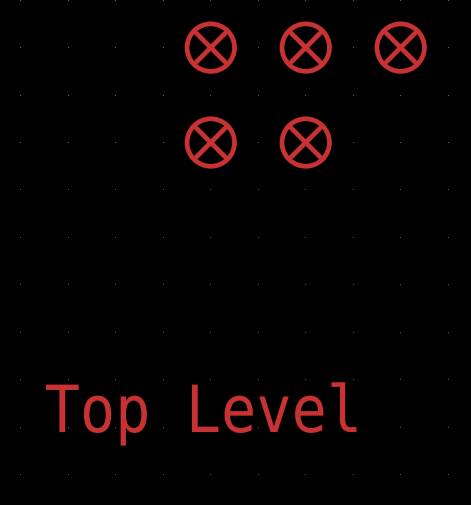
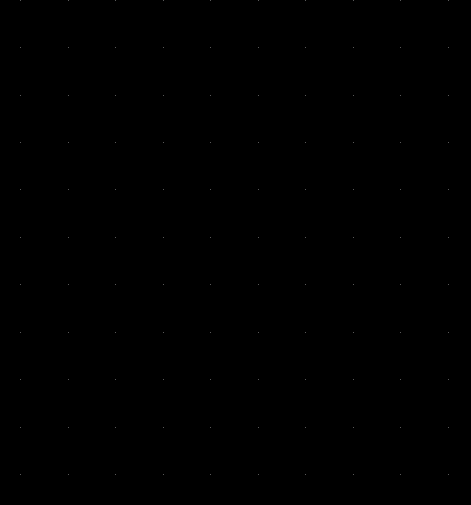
part: (210, 47) -> none
part: (305, 47) -> none
part: (400, 47) -> none
part: (210, 142) -> none
part: (305, 142) -> none
text: Top Level (201, 413) -> none

